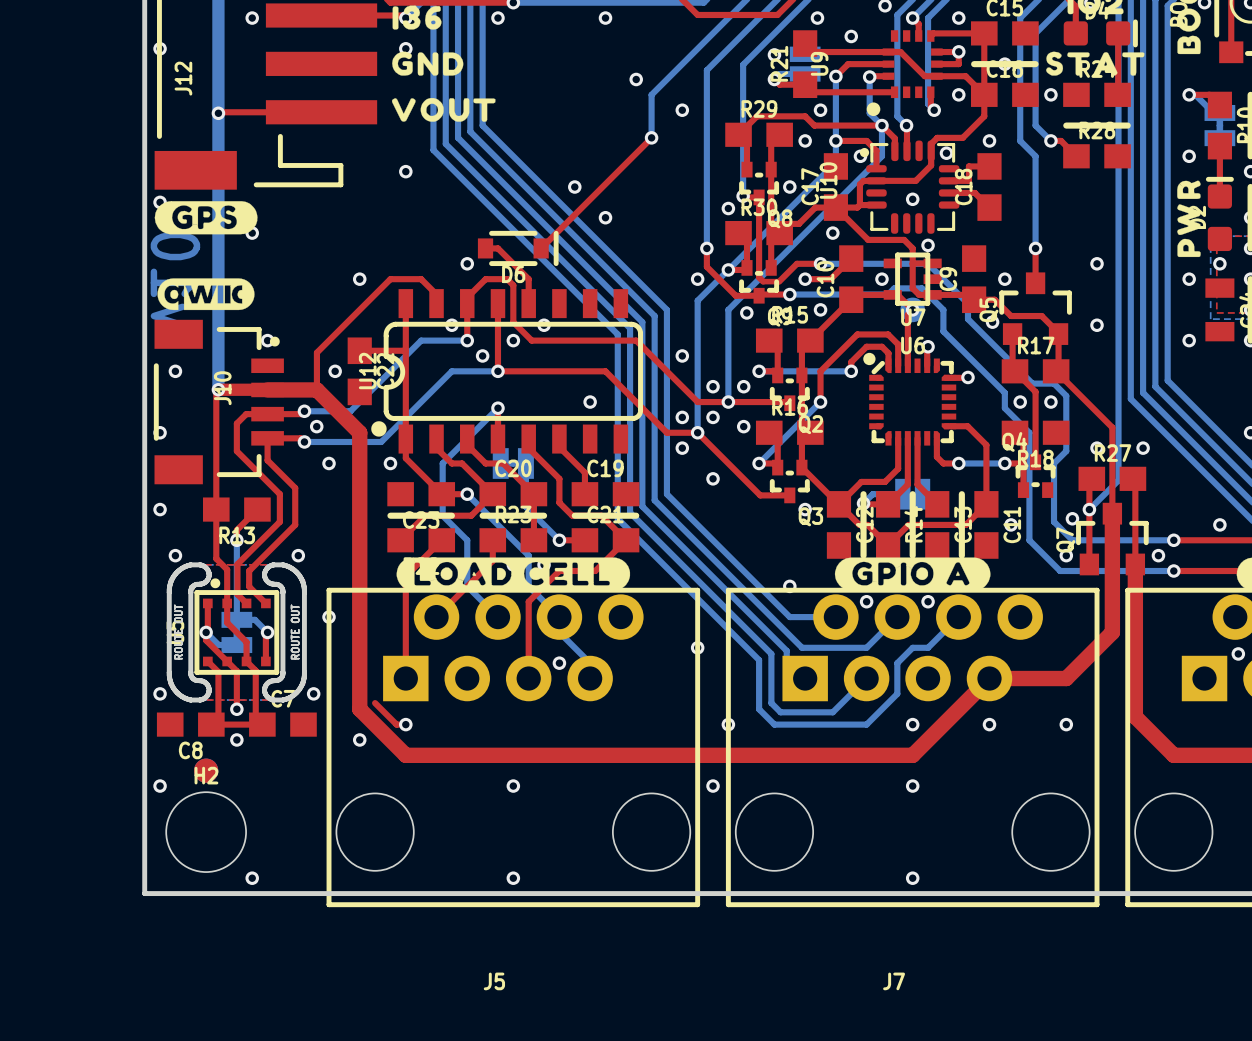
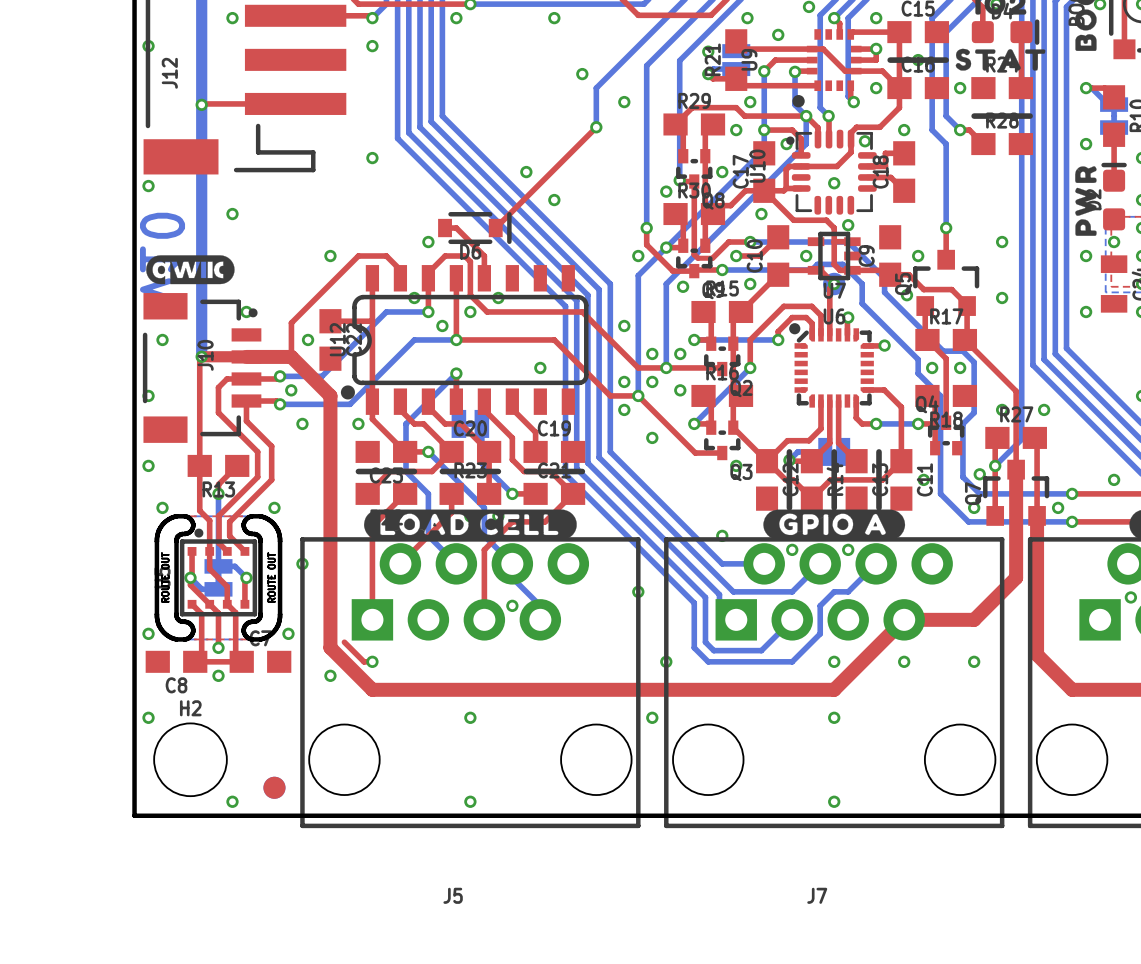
drawing: [391, 5, 496, 122] -> none
drawing: [154, 201, 258, 235] -> none
part position: (206, 770) -> (274, 787)

